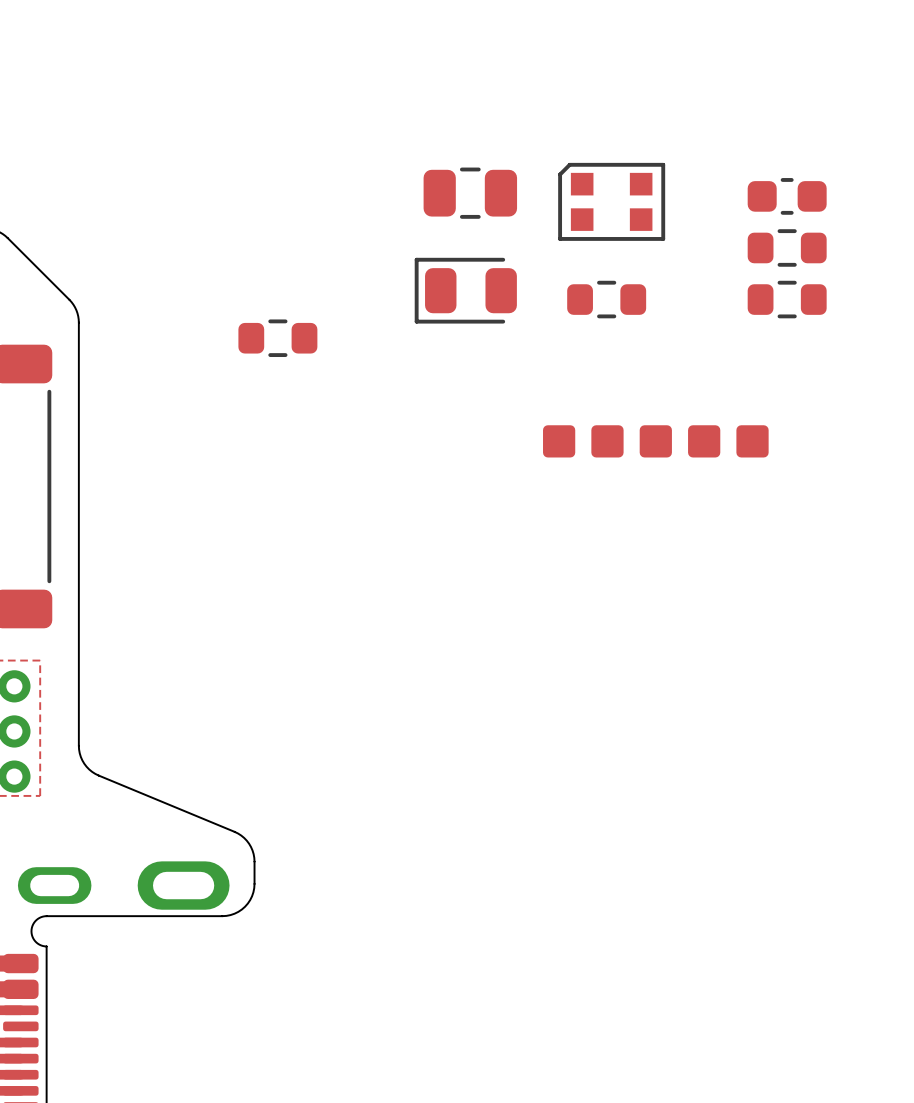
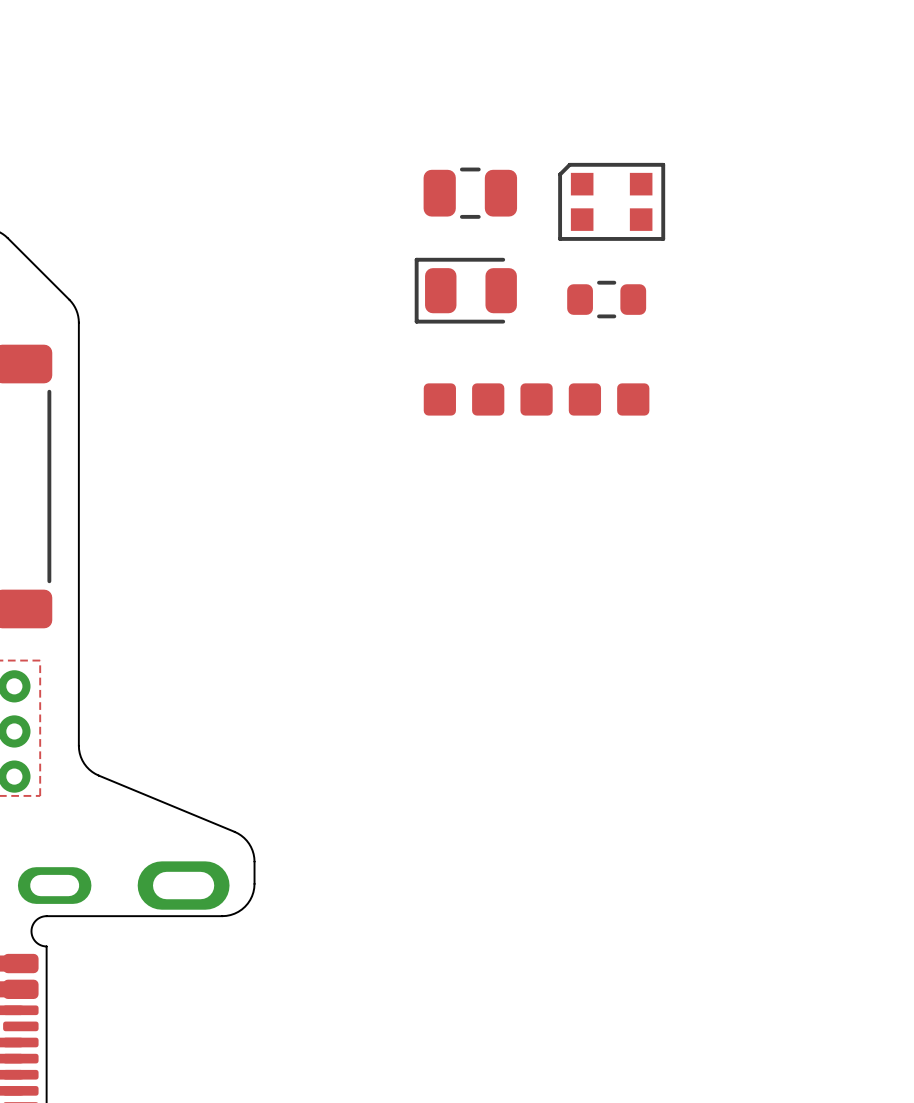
part: (787, 196) -> none
part: (787, 247) -> none
part: (787, 299) -> none
part: (277, 338) -> none
part position: (655, 441) -> (536, 399)

